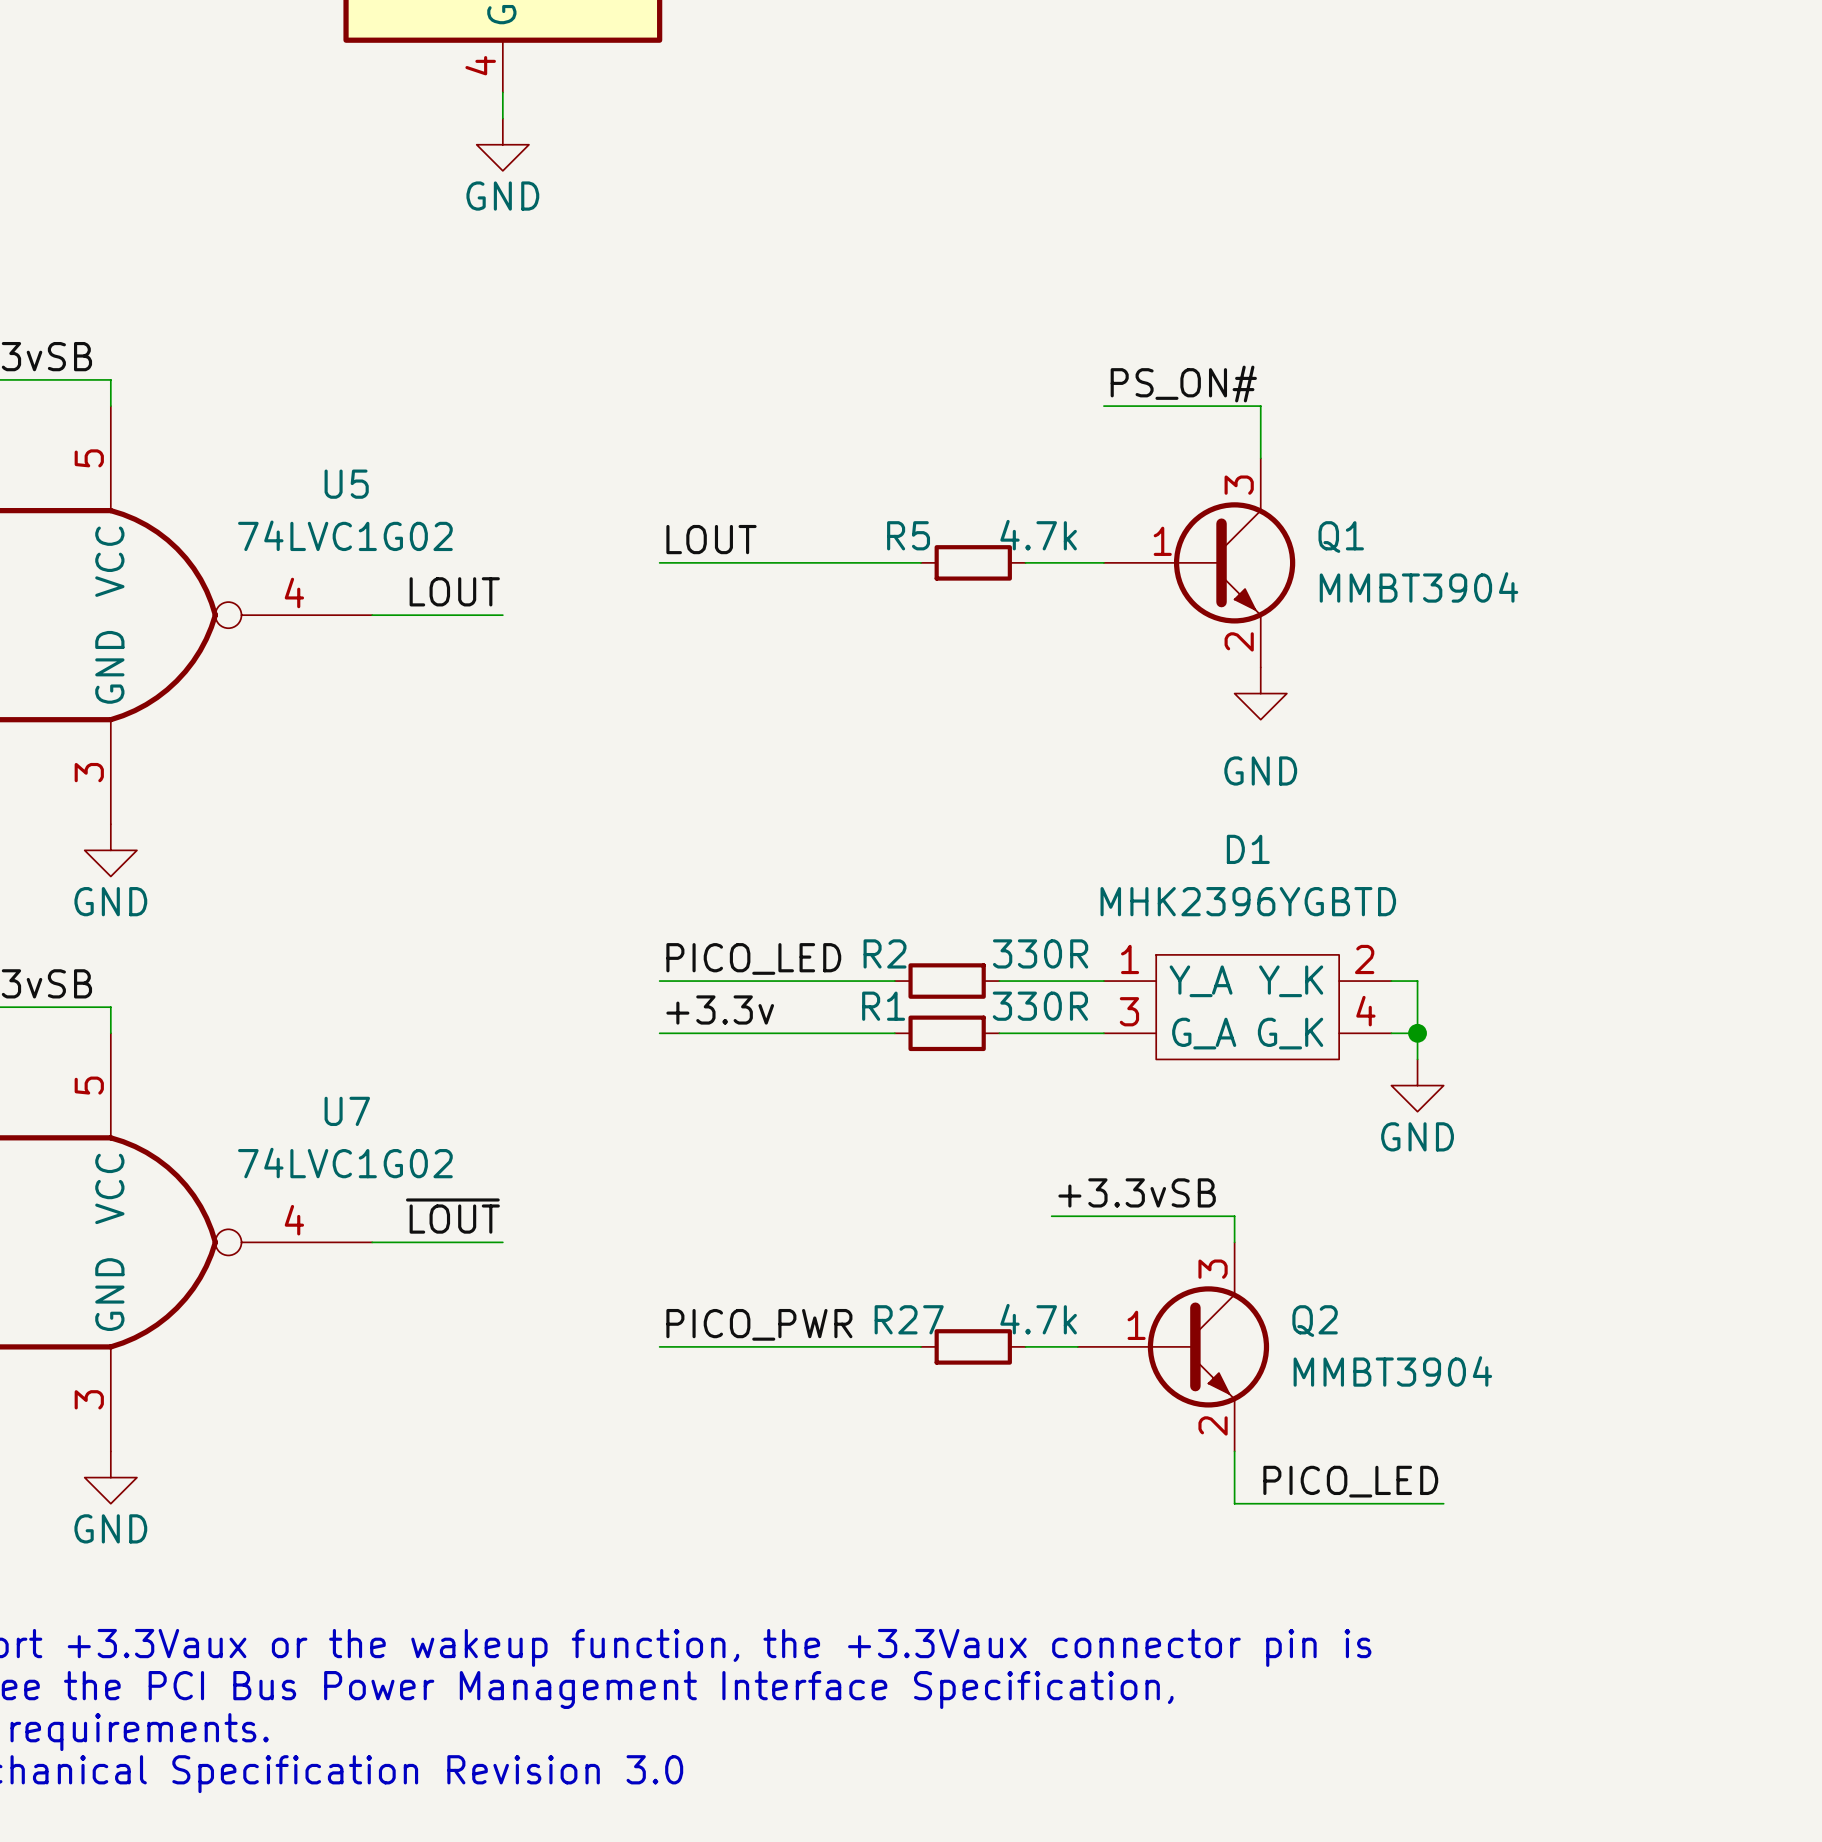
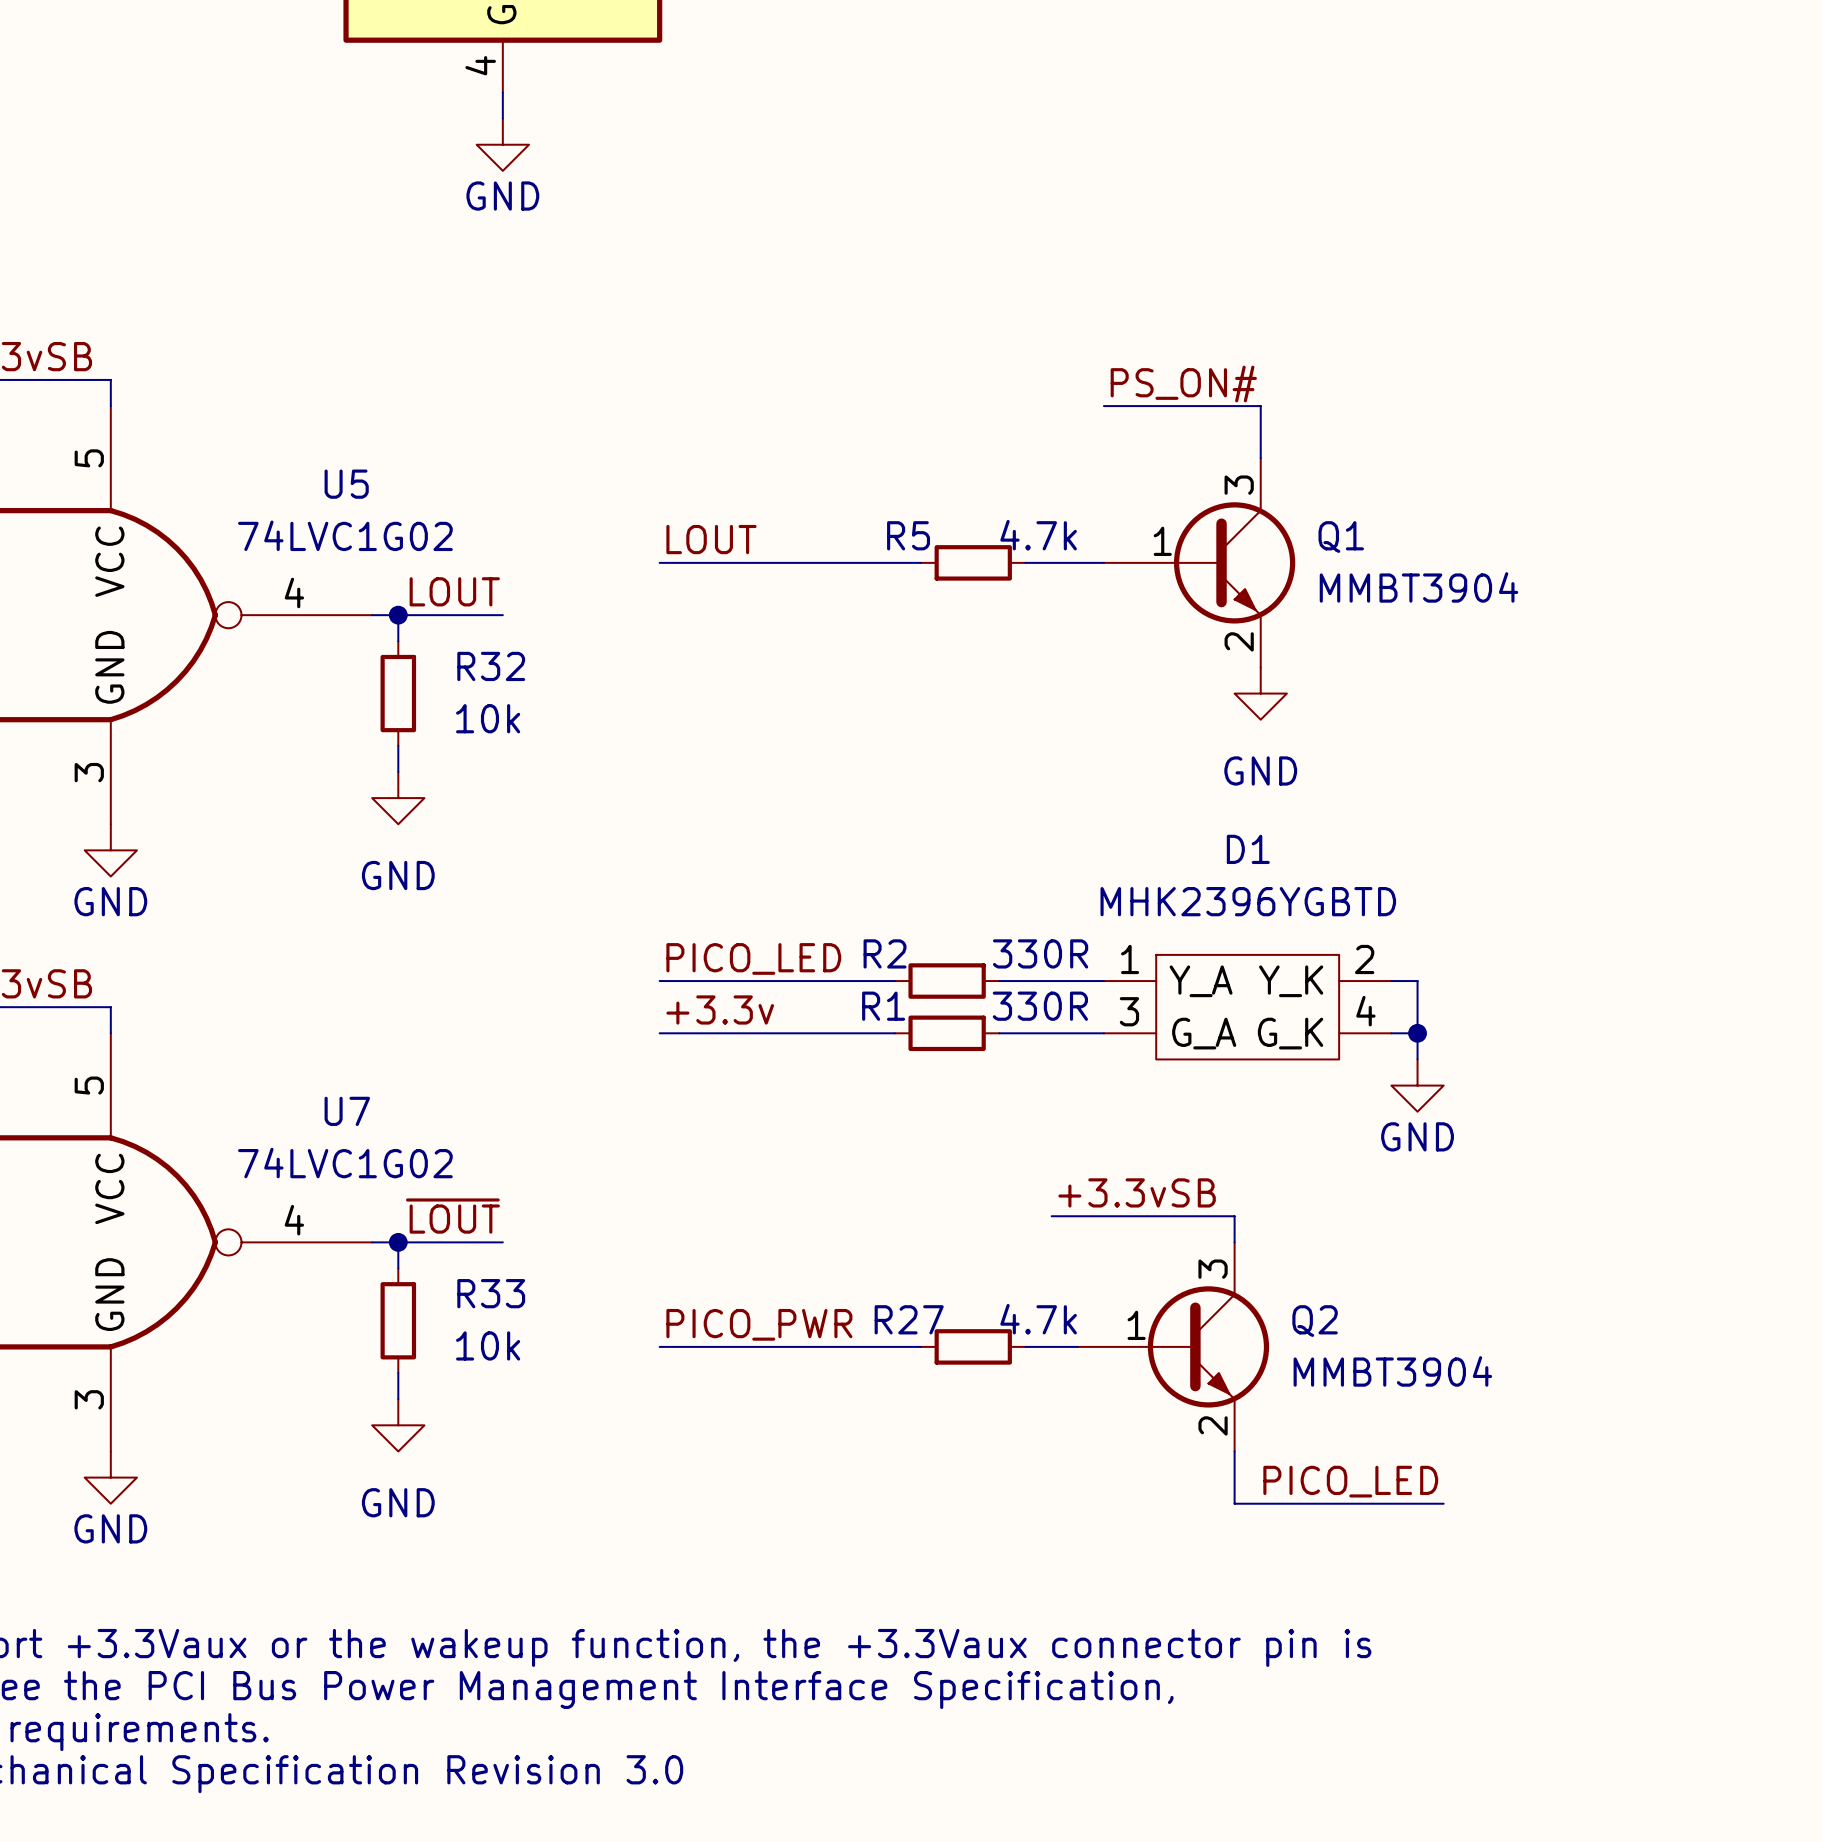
wire: none -> (398, 615) (398, 641)
junction: none -> (398, 615)
R32: none -> 10k (398, 693)
wire: none -> (398, 745) (398, 771)
power symbol: none -> GND (398, 798)
wire: none -> (398, 1242) (398, 1268)
junction: none -> (398, 1242)
R33: none -> 10k (398, 1320)
wire: none -> (398, 1373) (398, 1399)
power symbol: none -> GND (398, 1425)

